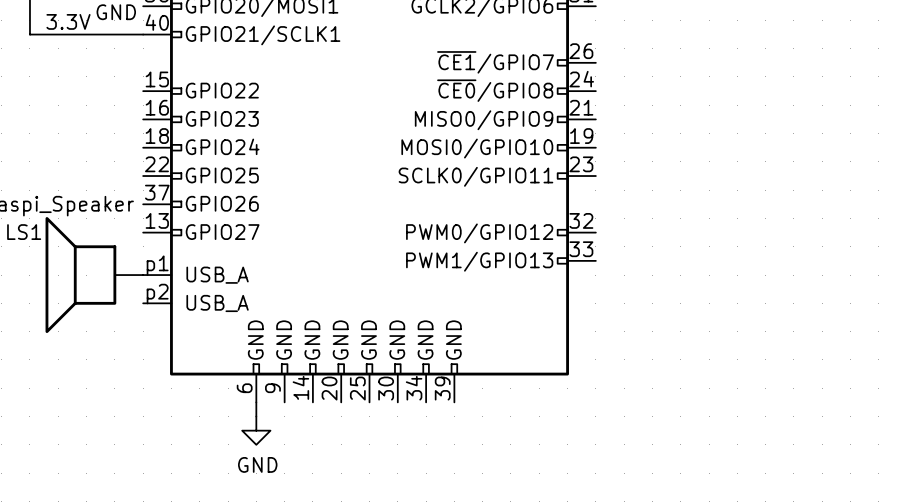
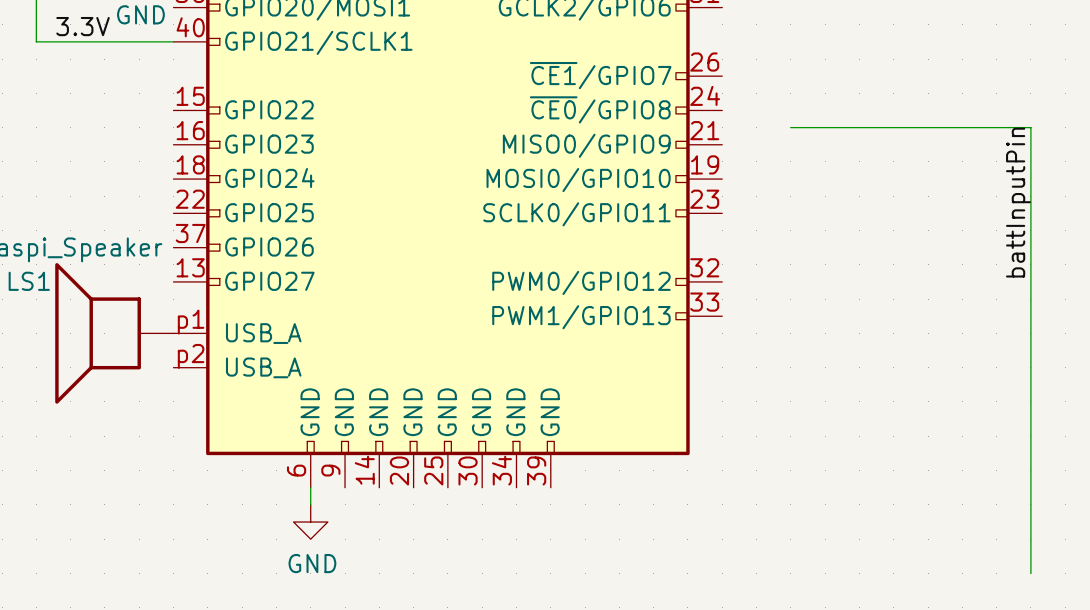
wire: none -> (790, 127) (1030, 127) (1030, 573)
label: none -> battInputPin (1018, 202)

